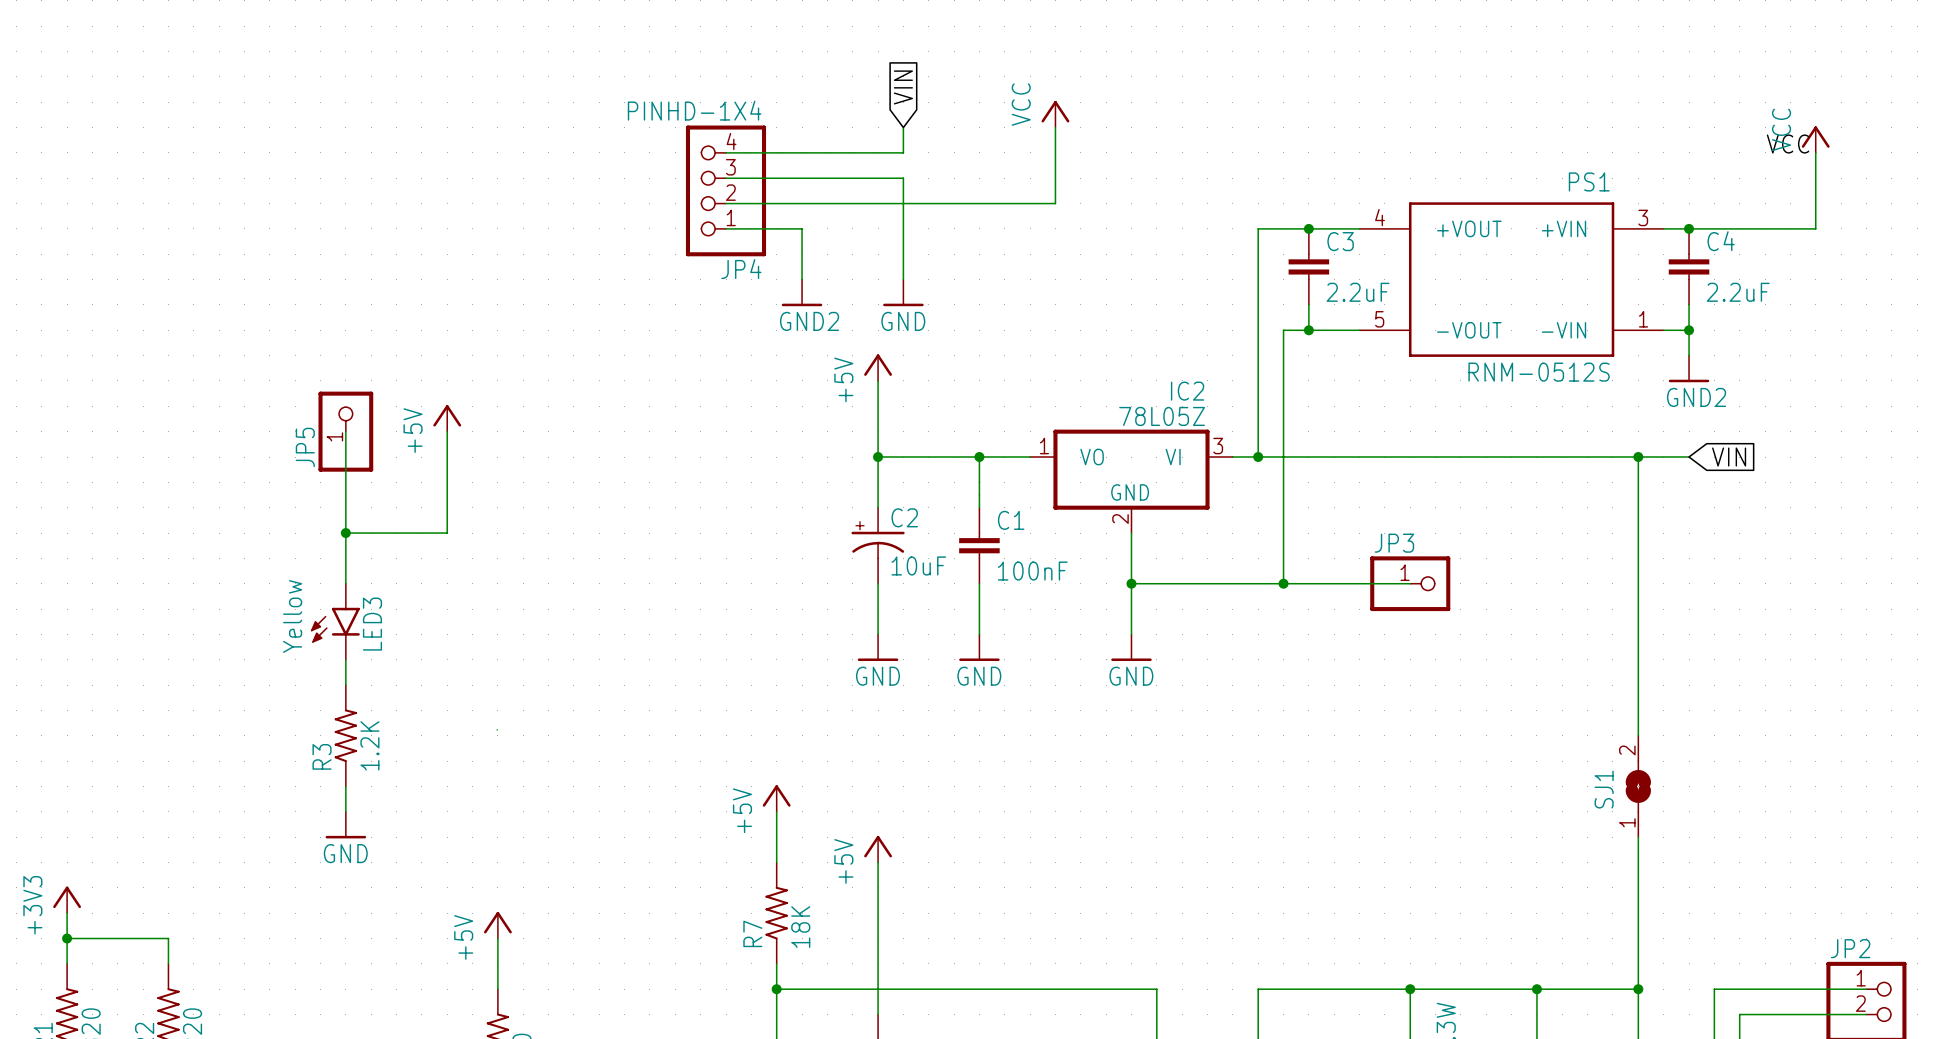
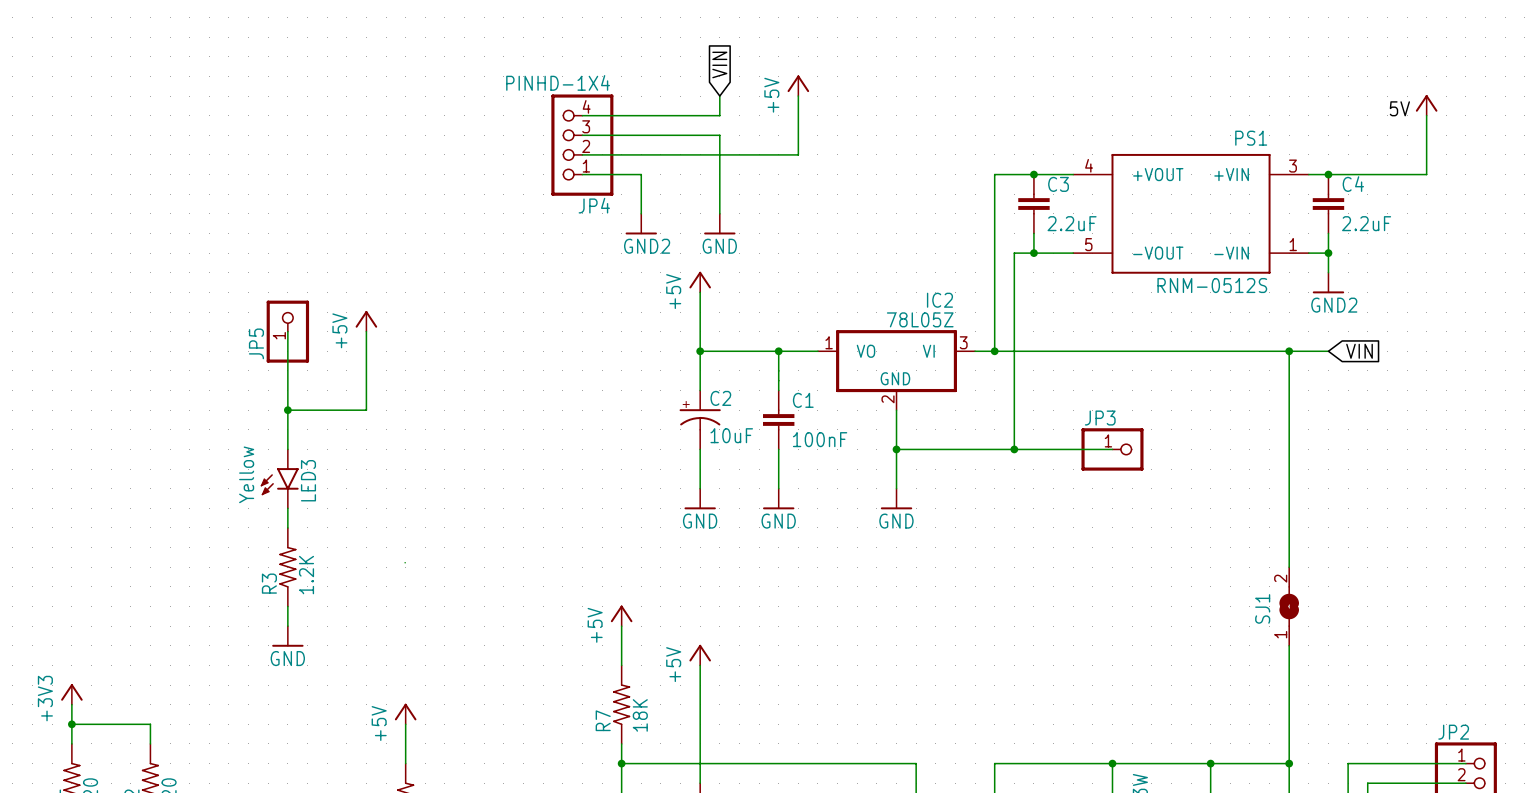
power symbol: none -> +5V (798, 85)
power symbol: VCC (1055, 114) -> none
wire: (1055, 127) (1055, 203) (1004, 203) -> (798, 96) (798, 154)
power symbol text: VCC (1781, 129) -> none
label: VCC (1788, 144) -> 5V (1399, 108)

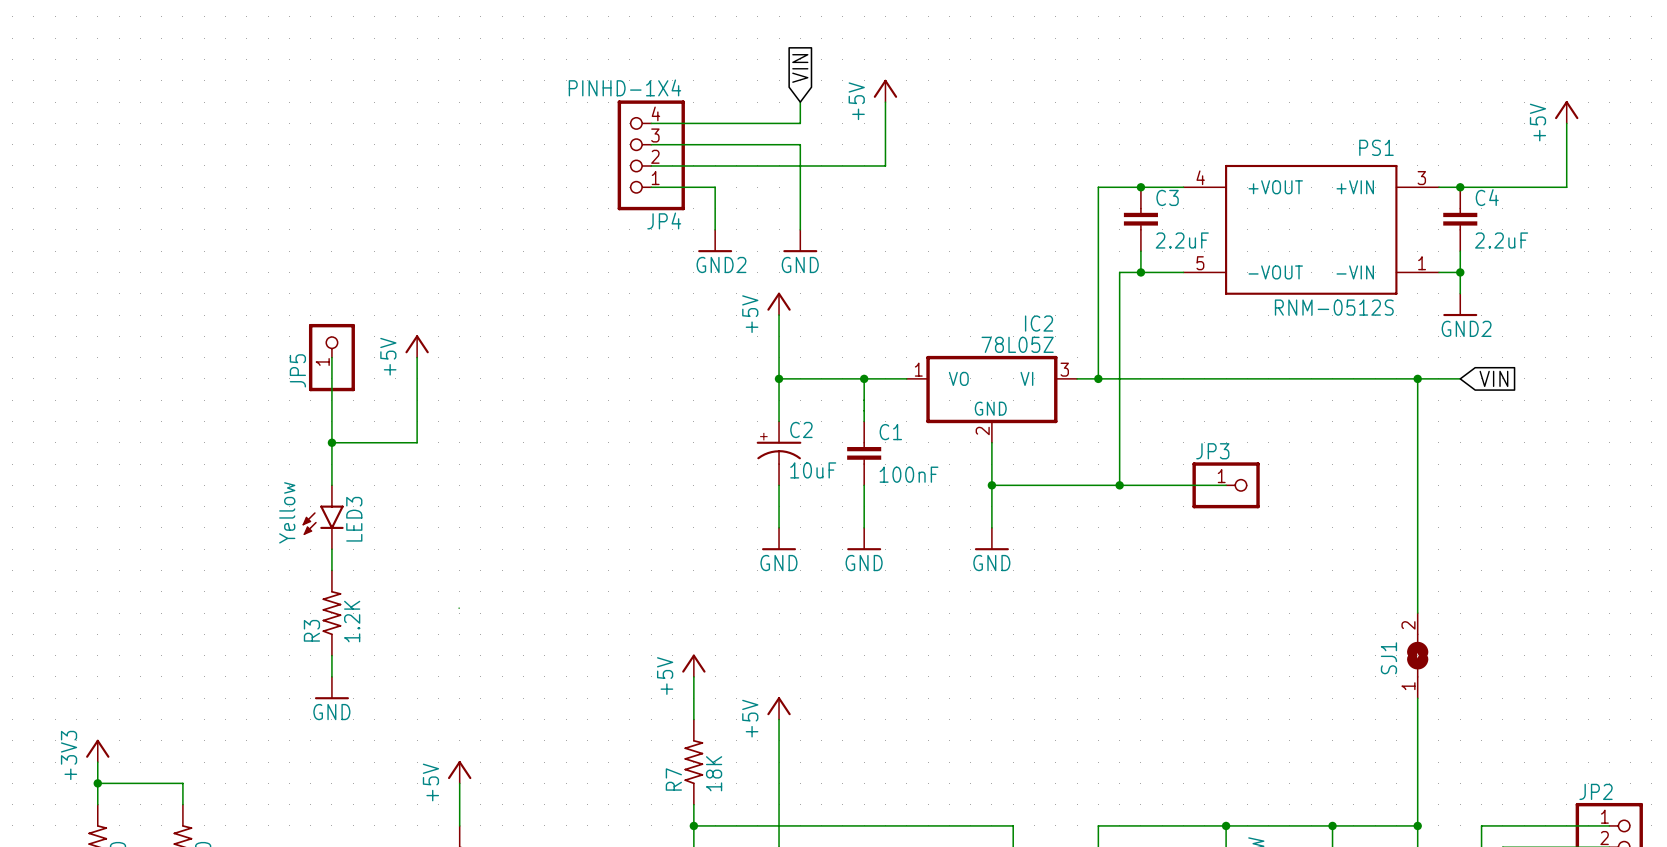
label: 5V (1399, 108) -> none
power symbol text: none -> +5V (1537, 122)

